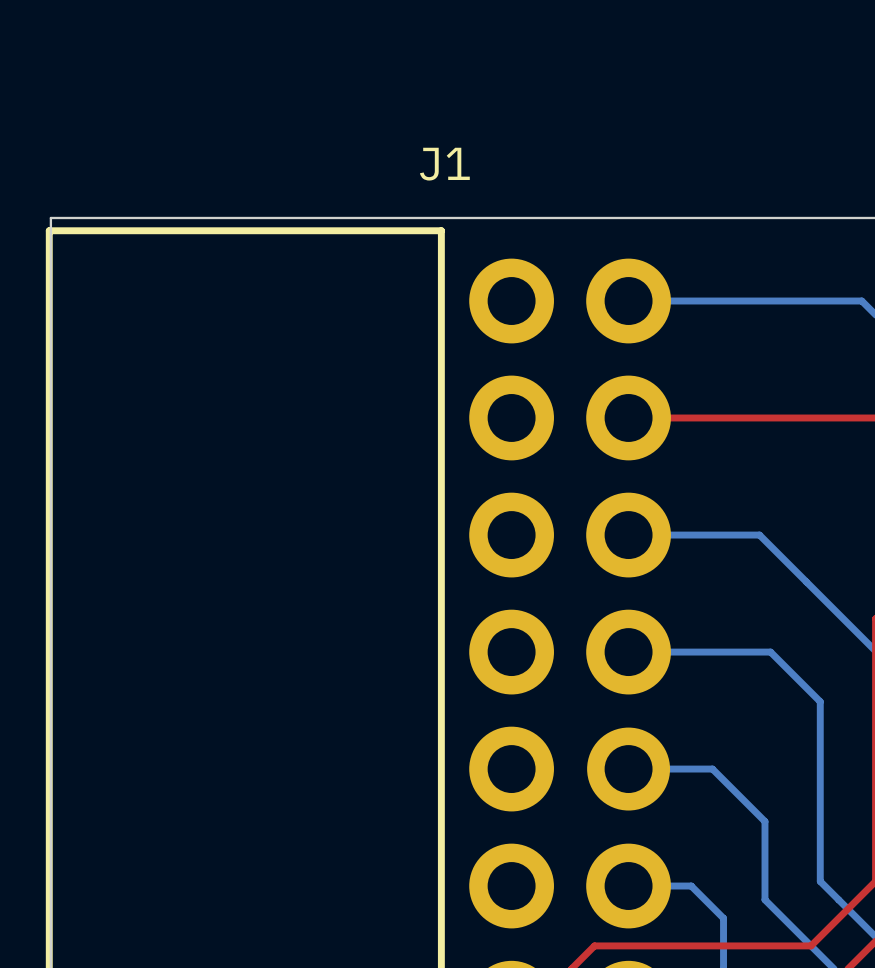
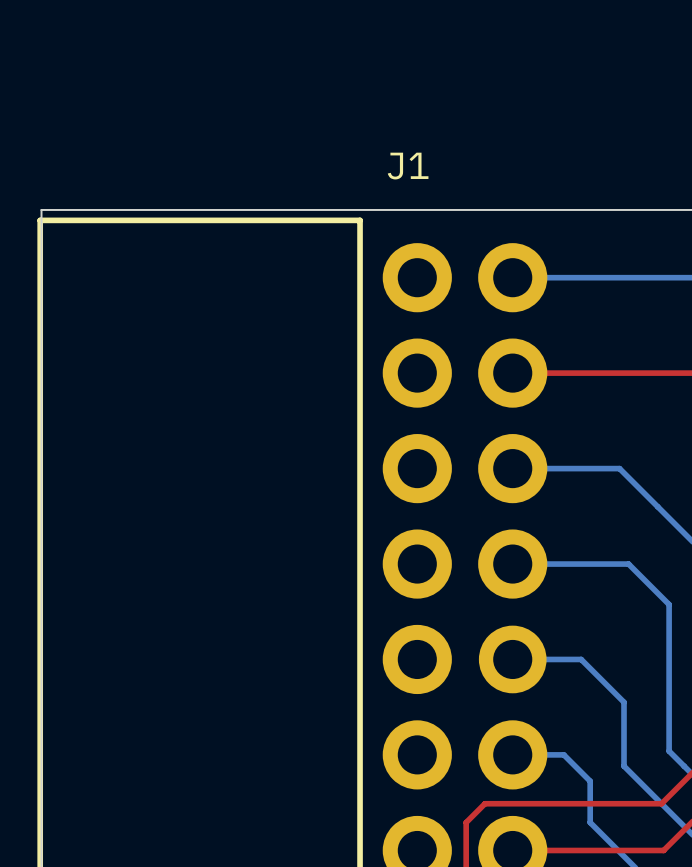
J1 name position: J1 (444, 164) -> J1 (408, 166)

